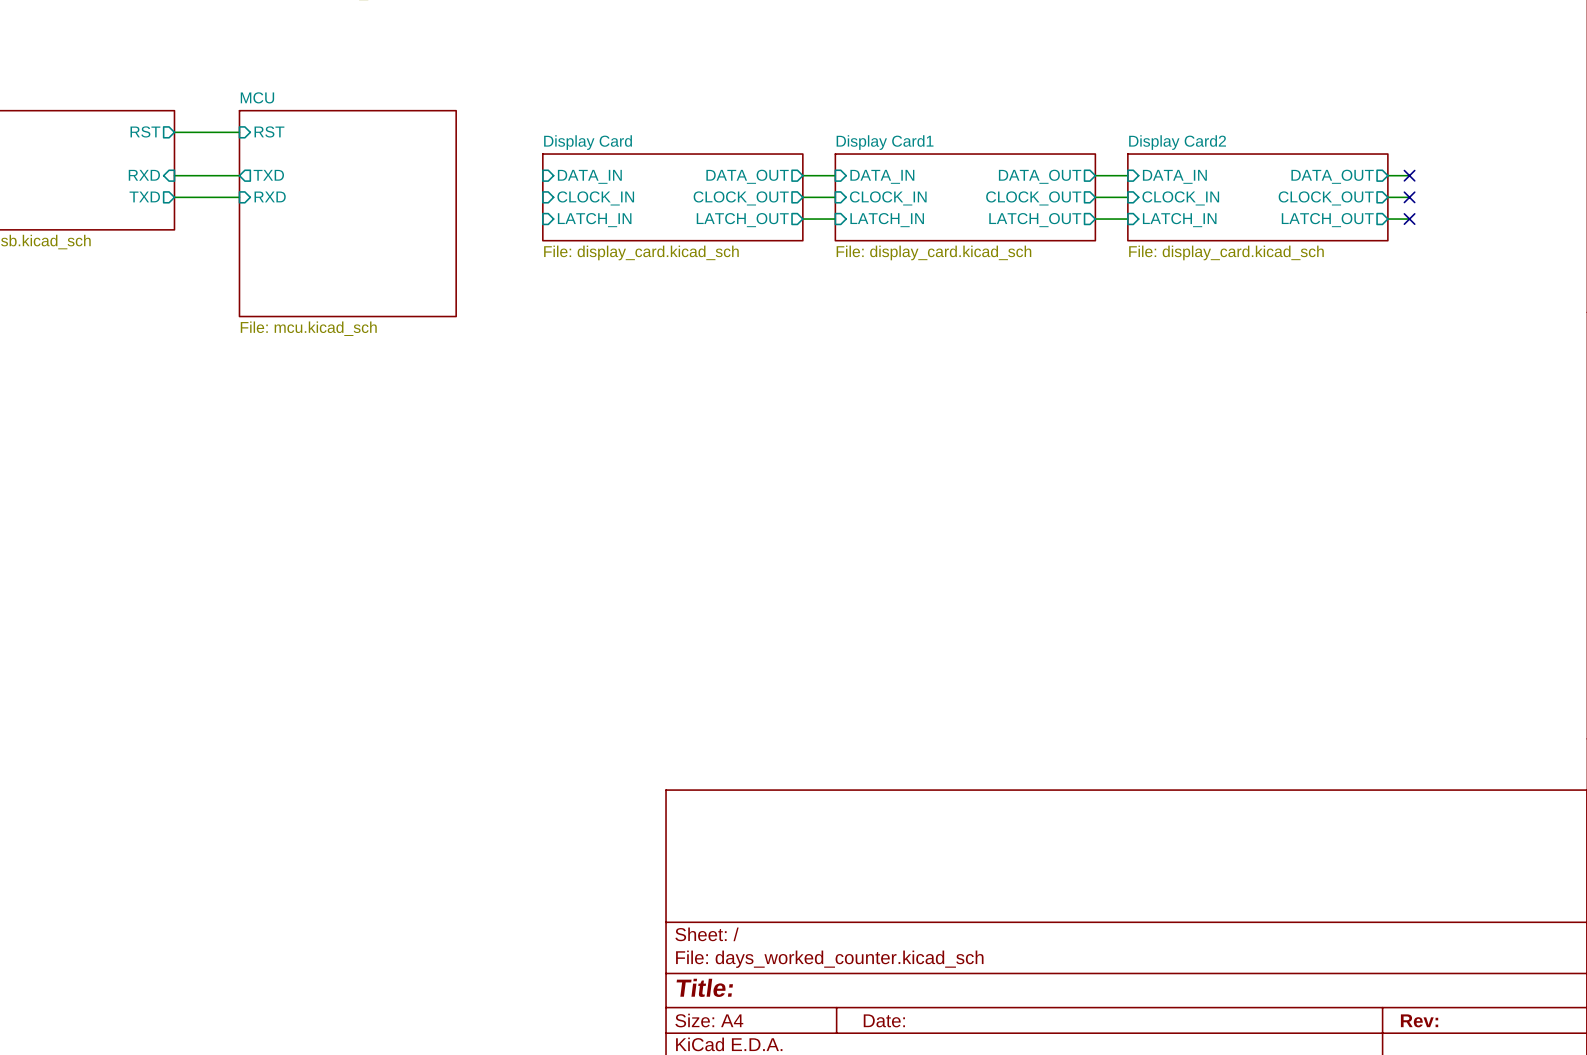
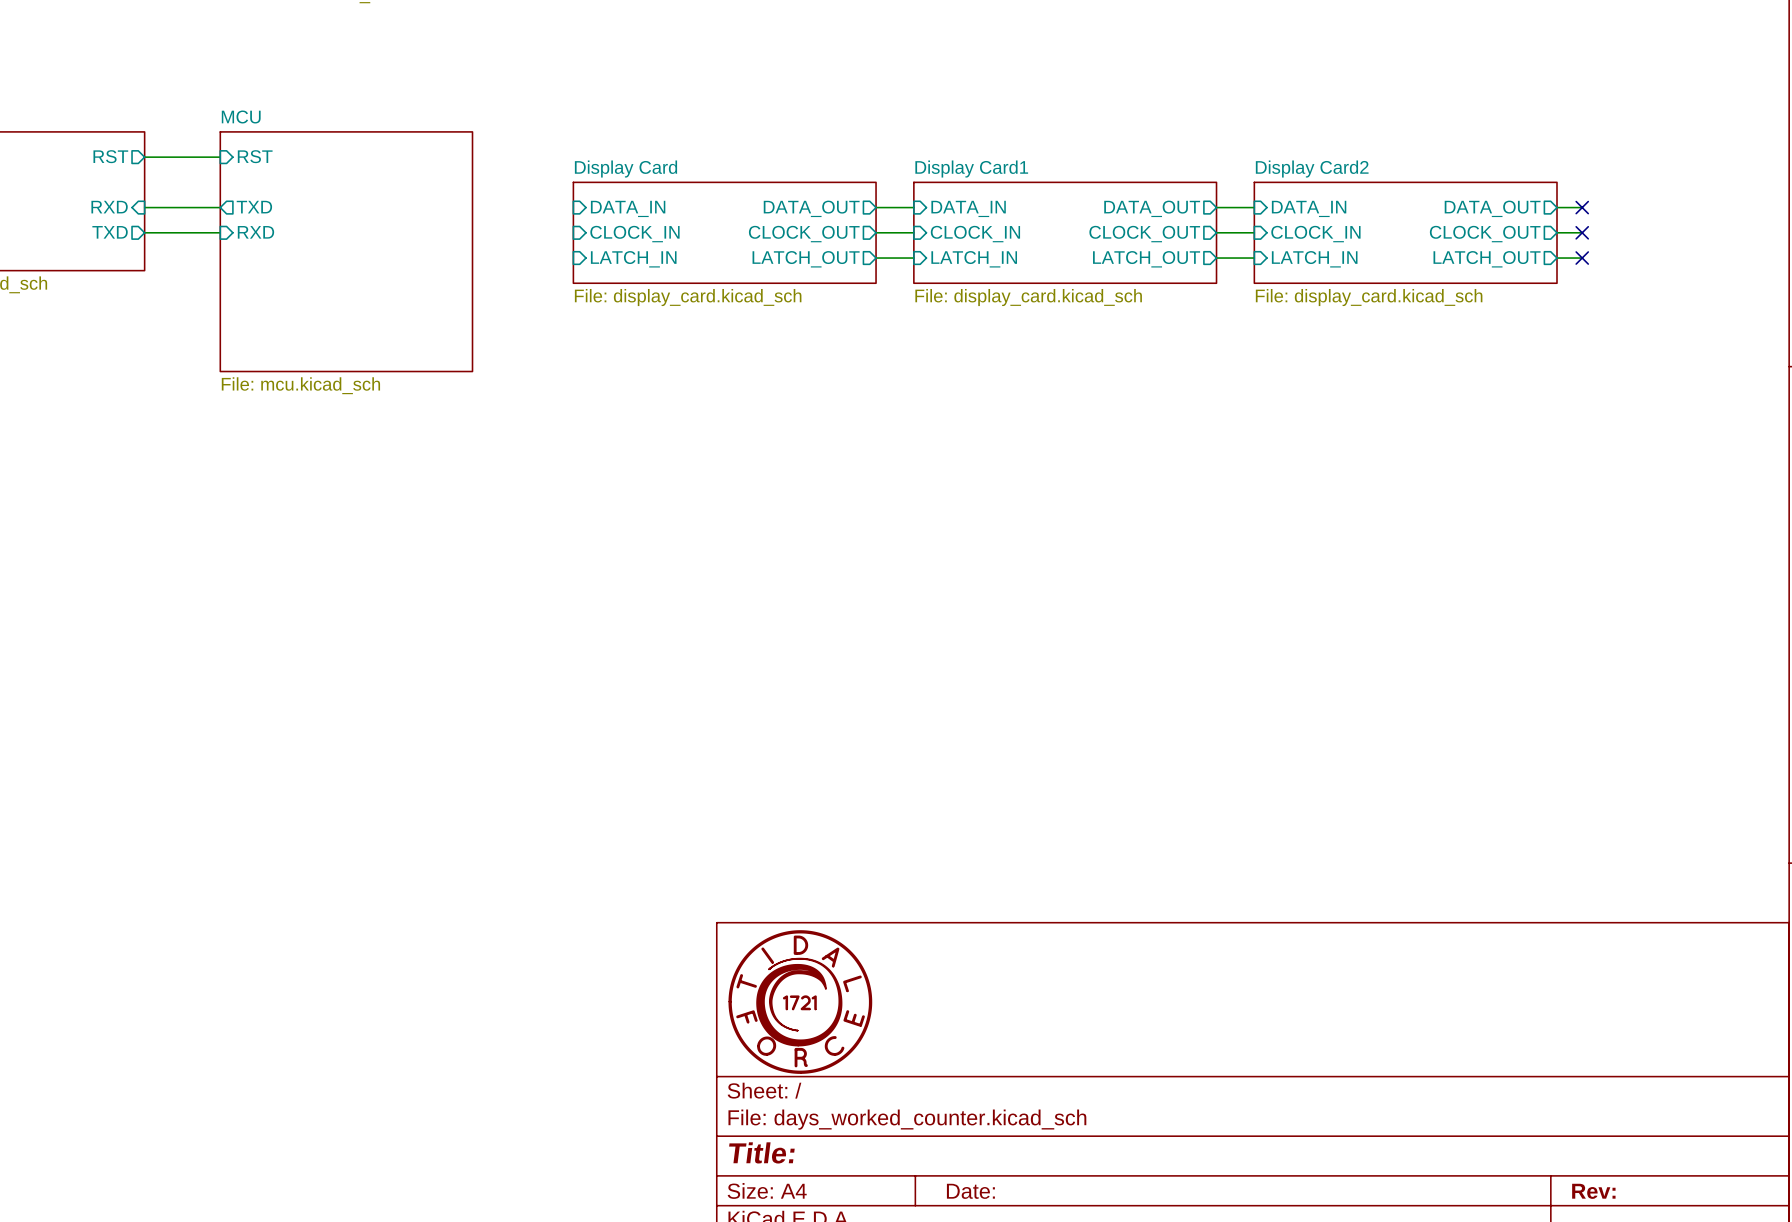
power symbol: none -> (800, 1002)

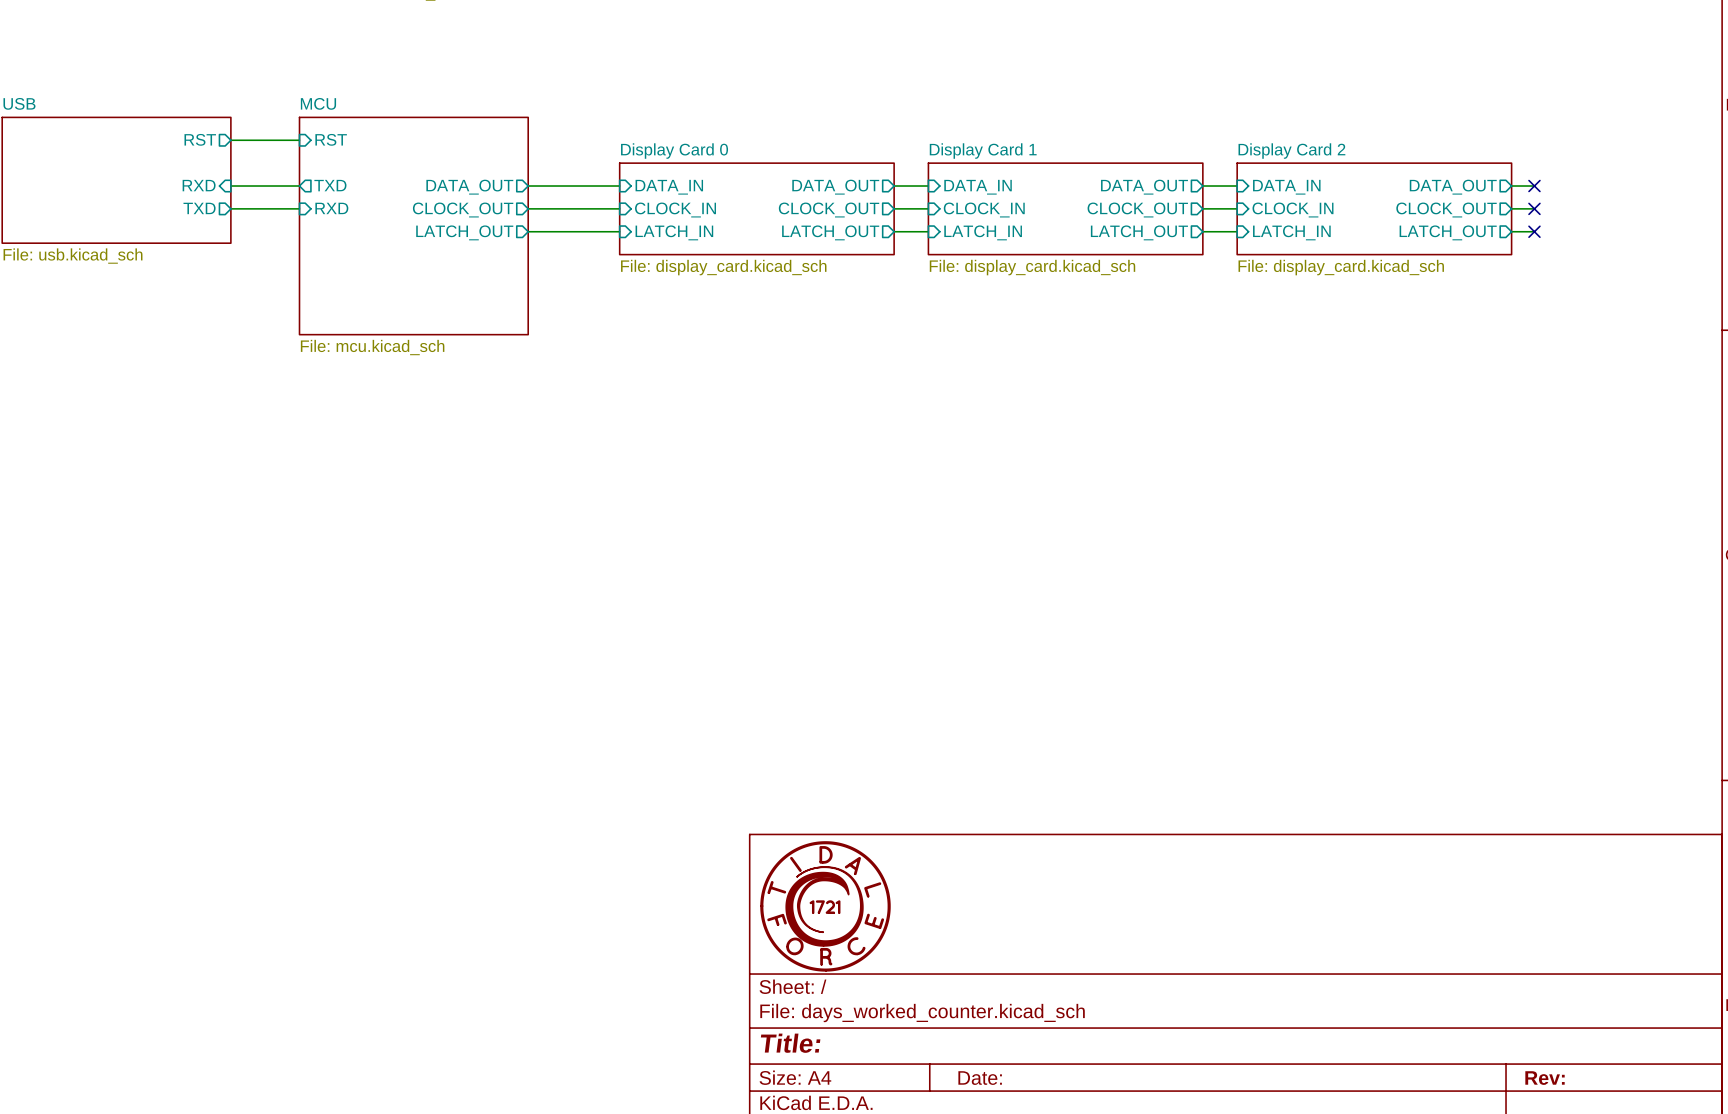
sheet Display Card name: Display Card (626, 169) -> Display Card 0 (674, 151)
sheet Display Card1 name: Display Card1 (971, 169) -> Display Card 1 (983, 151)
sheet Display Card2 name: Display Card2 (1312, 169) -> Display Card 2 (1291, 151)
wire: none -> (528, 186) (619, 186)
sheet pin: none -> DATA_OUT (469, 187)
wire: none -> (528, 208) (619, 208)
sheet pin: none -> CLOCK_OUT (463, 210)
wire: none -> (528, 231) (619, 231)
sheet pin: none -> LATCH_OUT (464, 232)

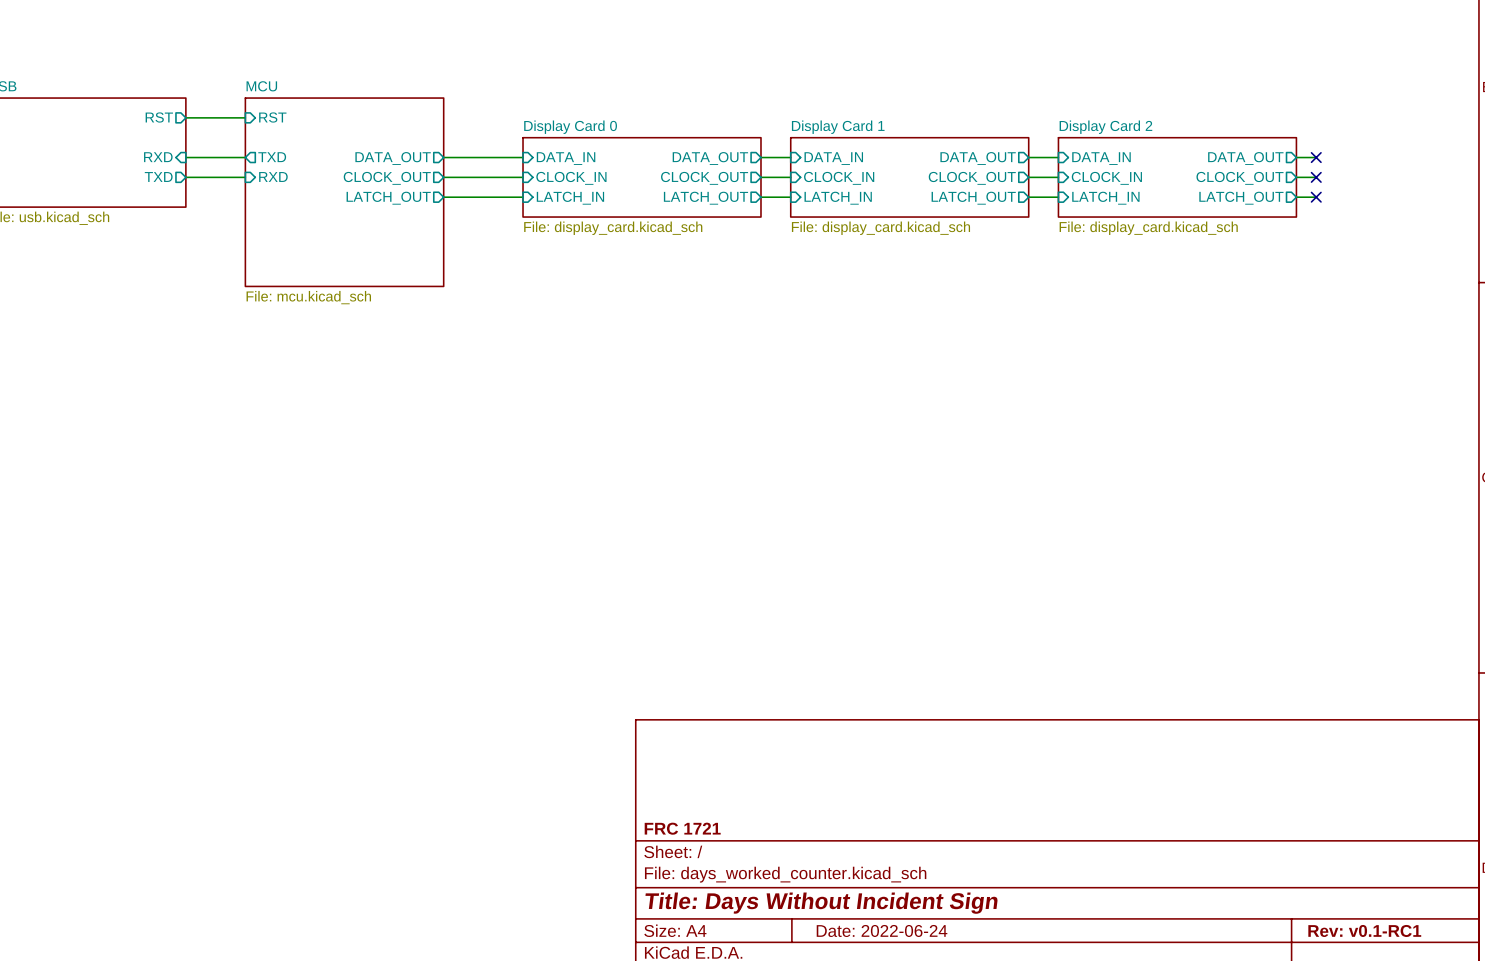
power symbol: (825, 906) -> none
title block: none -> FRC 1721 (682, 828)
title block: Title: (790, 1043) -> Title: Days Without Incident Sign (821, 903)
title block: Date: (980, 1078) -> Date: 2022-06-24 (882, 930)
title block: Rev: (1545, 1078) -> Rev: v0.1-RC1 (1364, 930)

